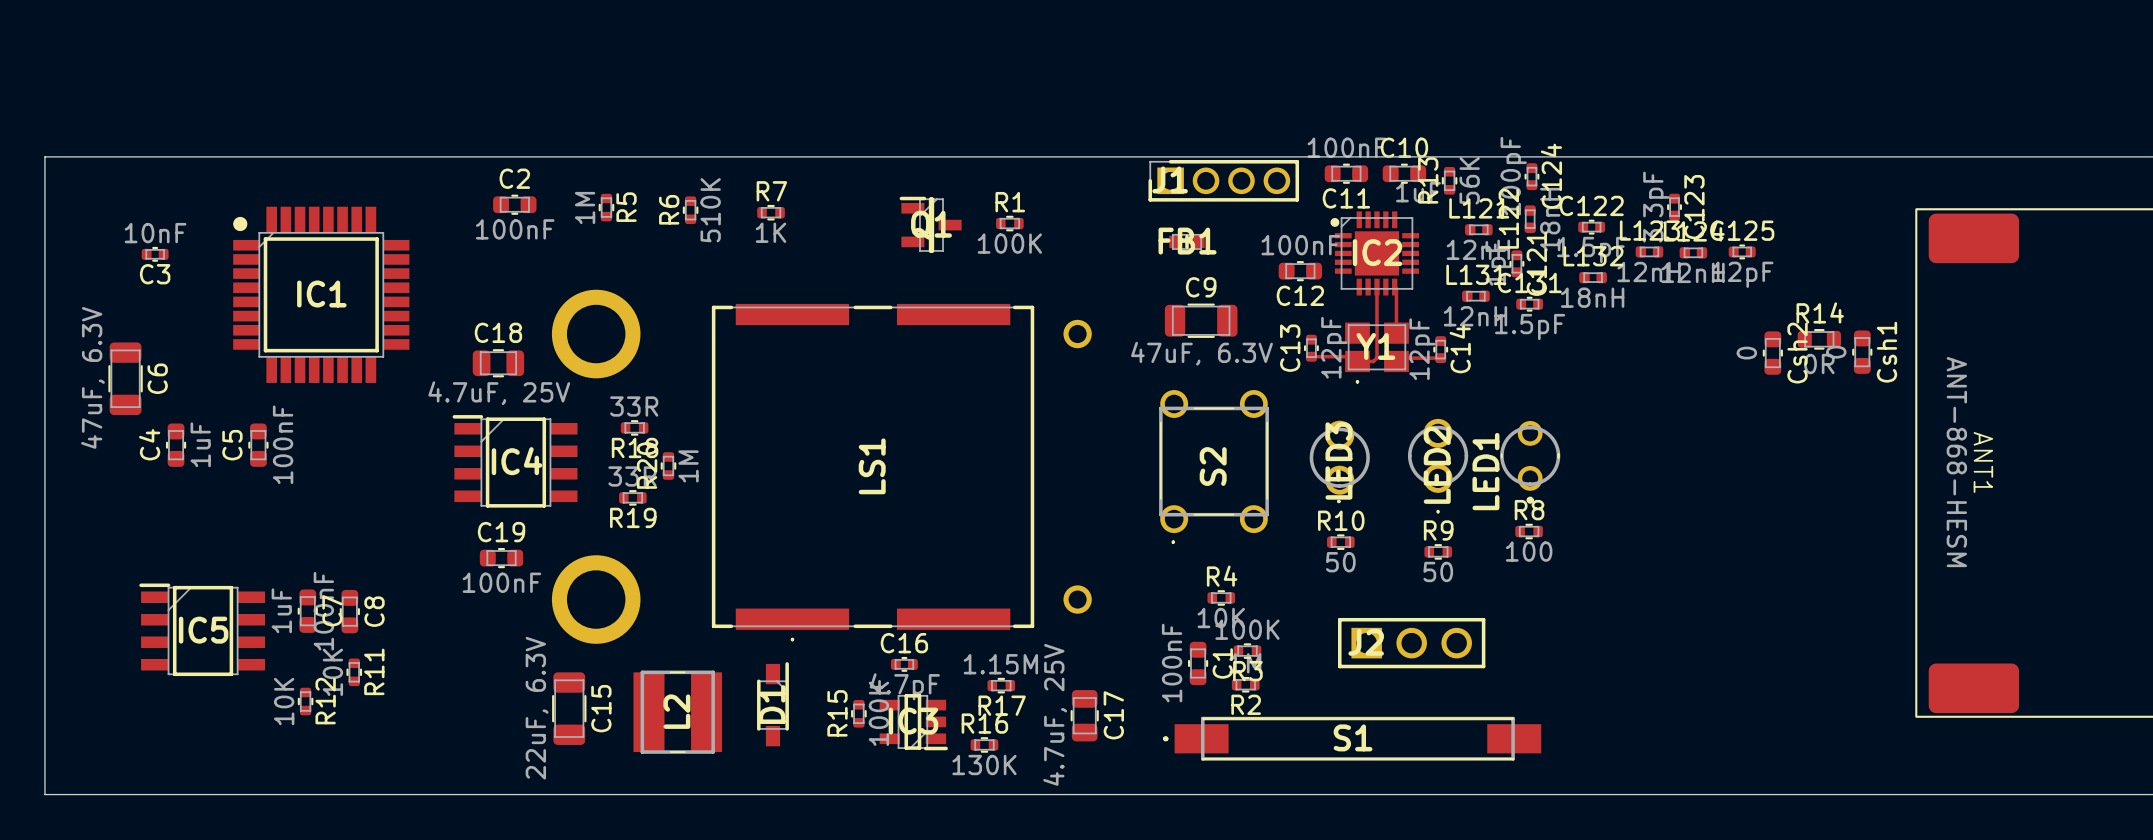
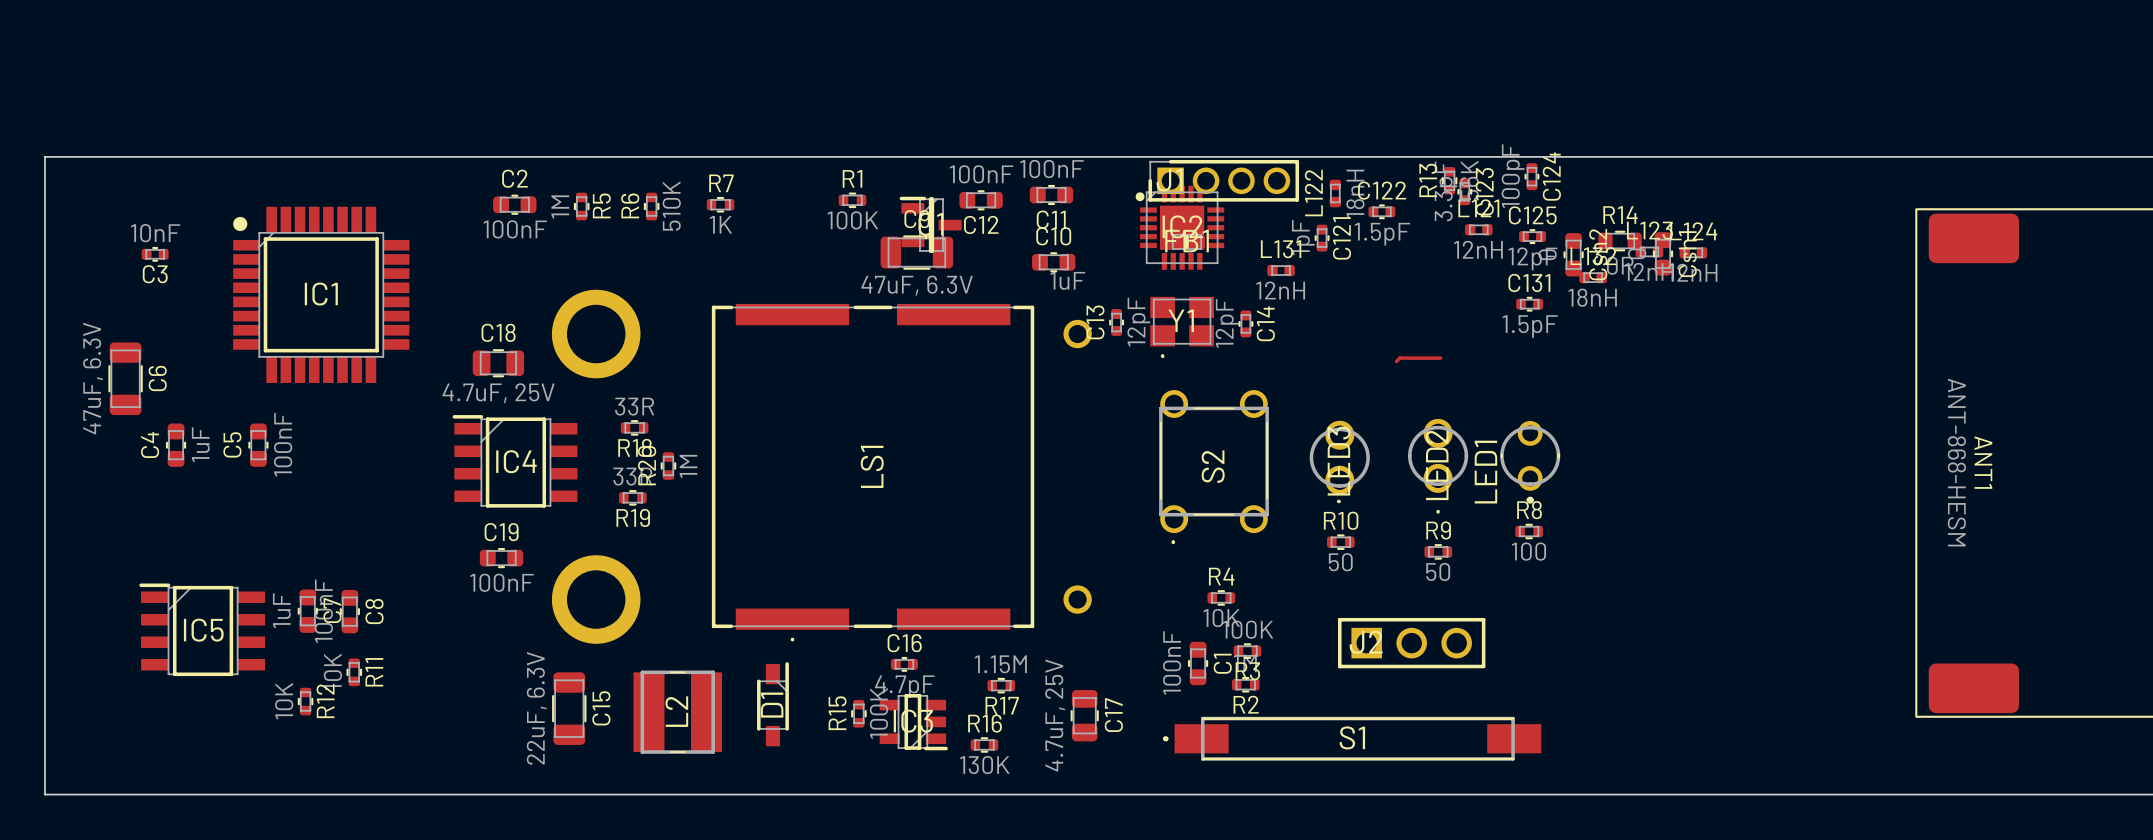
C11 position: (1346, 173) -> (1051, 194)
C10 position: (1404, 173) -> (1053, 262)
R5 position: (606, 207) -> (581, 206)
C123 position: (1674, 207) -> (1464, 191)
R6 position: (690, 210) -> (651, 206)
R7 position: (771, 212) -> (720, 204)
L122 position: (1530, 219) -> (1335, 193)
R1 position: (1009, 223) -> (852, 200)
C122 position: (1591, 227) -> (1381, 211)
C125 position: (1742, 251) -> (1532, 236)
IC2 position: (1374, 253) -> (1179, 227)
C121 position: (1516, 263) -> (1322, 238)
C12 position: (1300, 271) -> (981, 200)
top track: (1376, 287) (1376, 357) (1373, 361) (1357, 361) (1352, 356) (1311, 356) -> none
top track: (1394, 287) (1396, 288) (1396, 333) -> none
L131 position: (1475, 296) -> (1281, 270)
C9 position: (1201, 320) -> (916, 252)
R14 position: (1819, 339) -> (1620, 241)
C13 position: (1311, 348) -> (1116, 322)
C14 position: (1440, 349) -> (1245, 323)
Csh1 position: (1862, 352) -> (1663, 253)
Y1 position: (1376, 353) -> (1182, 327)
Csh2 position: (1772, 353) -> (1573, 254)

